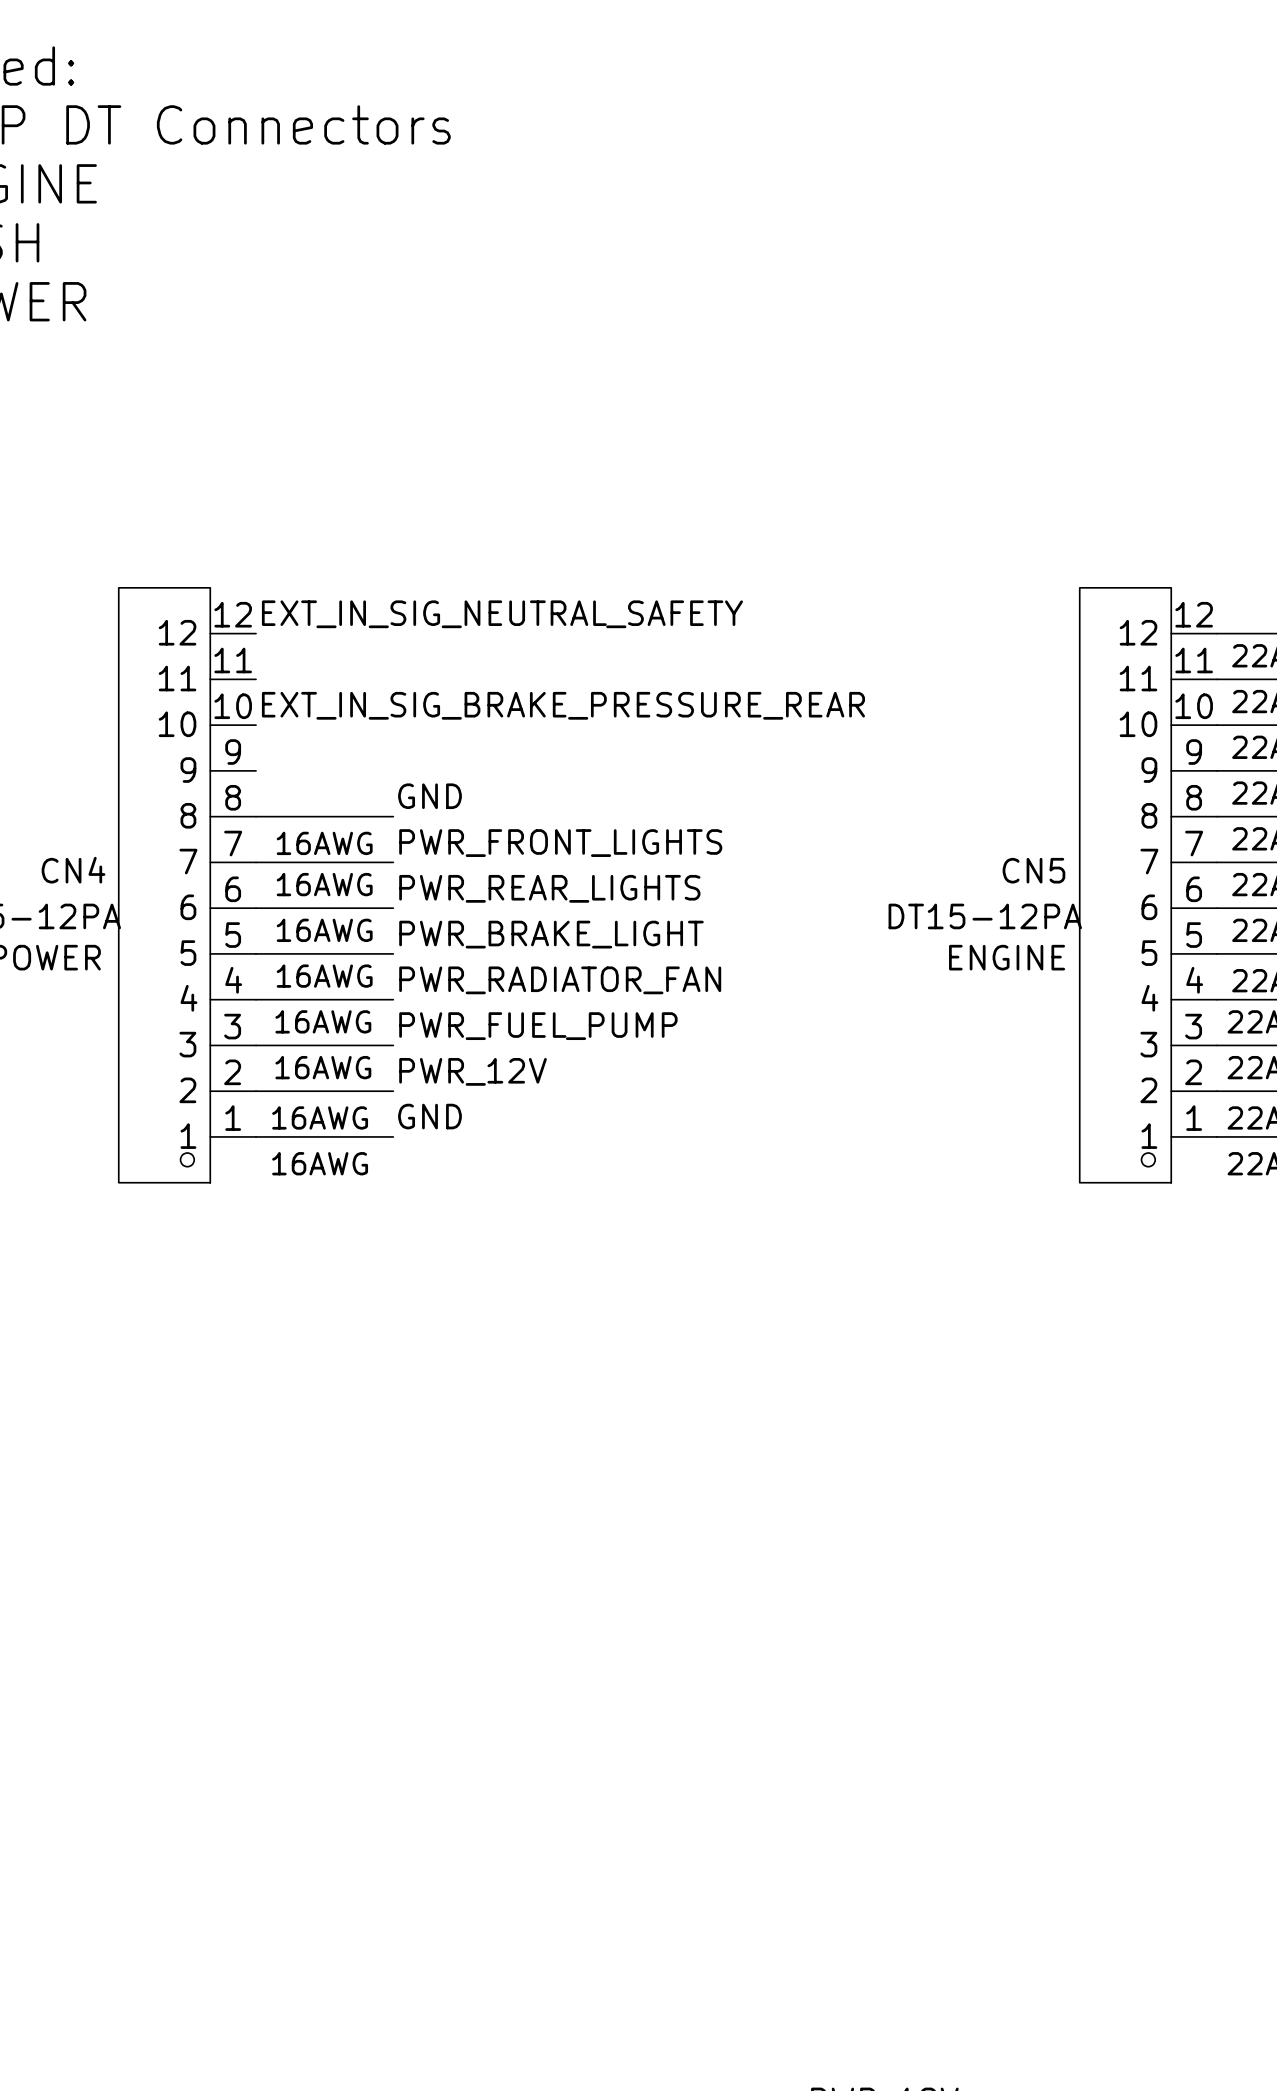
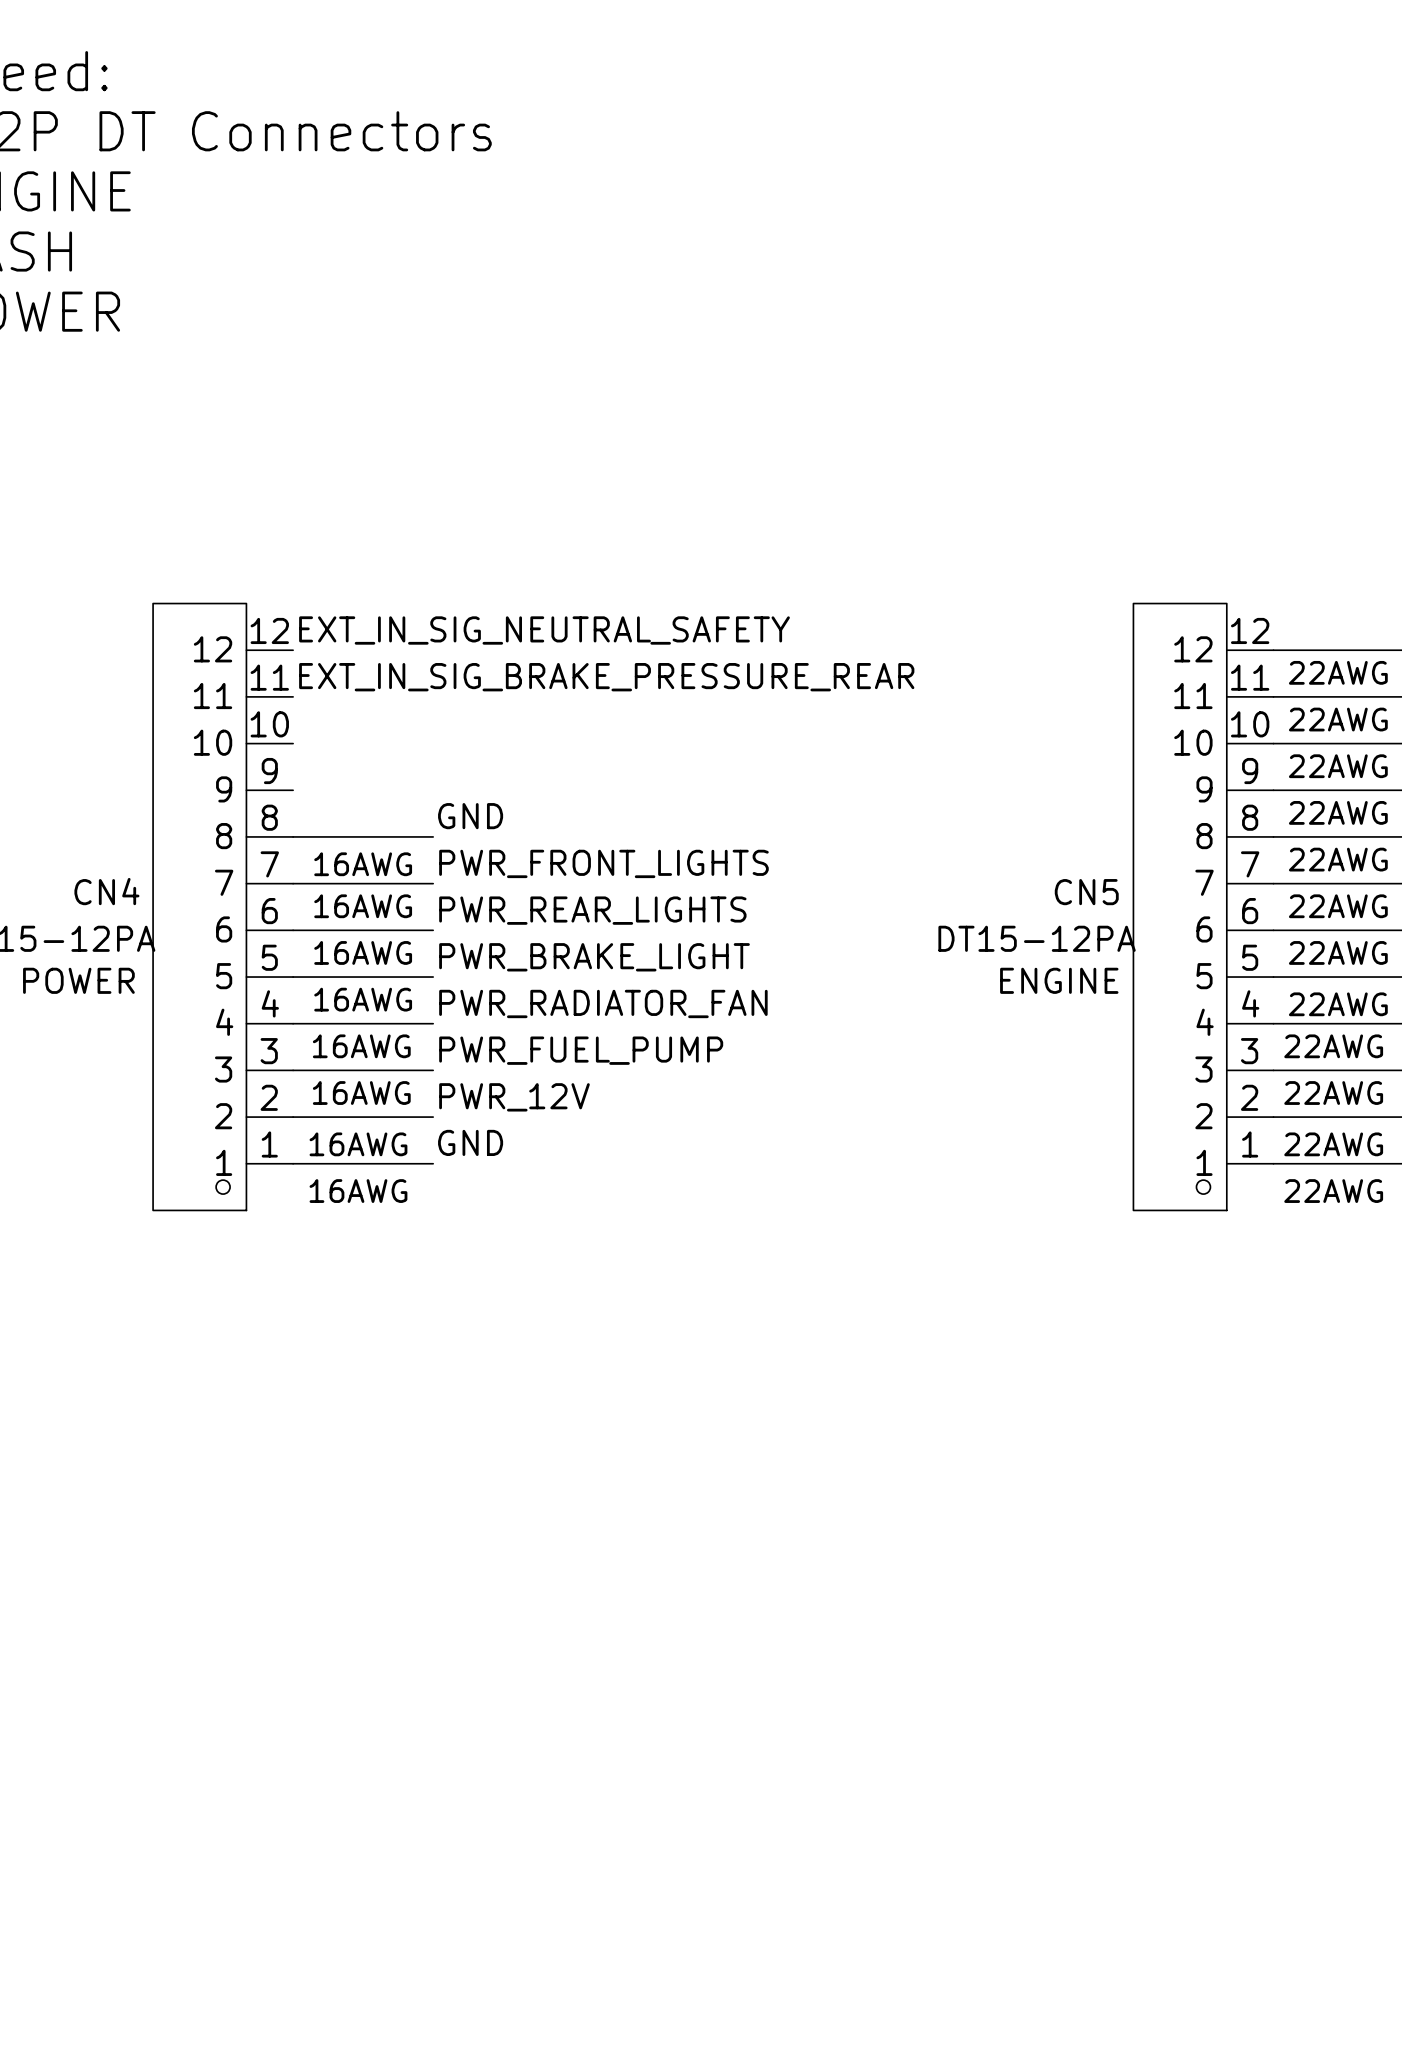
label position: EXT_IN_SIG_BRAKE_PRESSURE_REAR (563, 705) -> EXT_IN_SIG_BRAKE_PRESSURE_REAR (606, 677)

